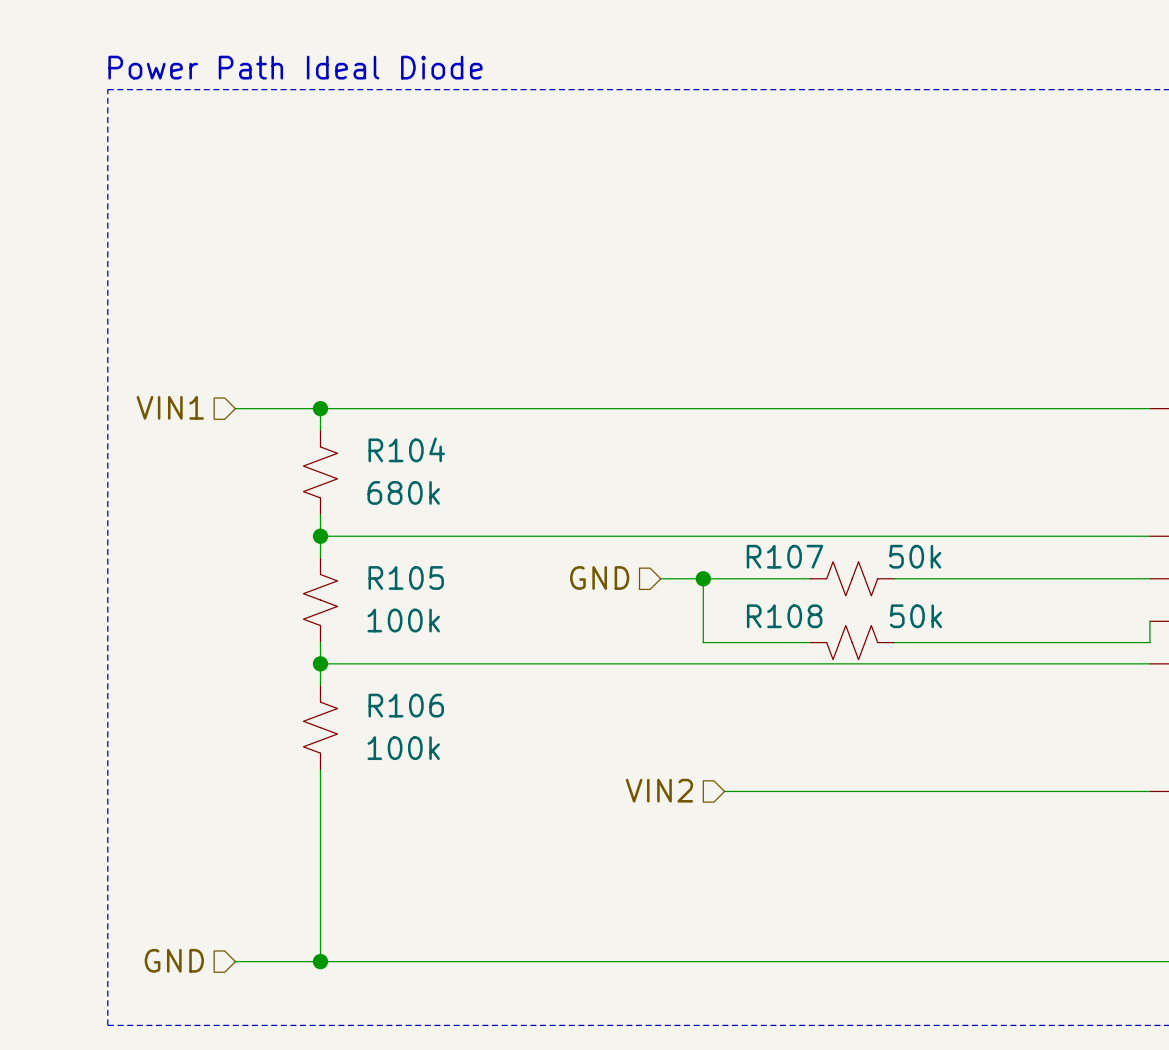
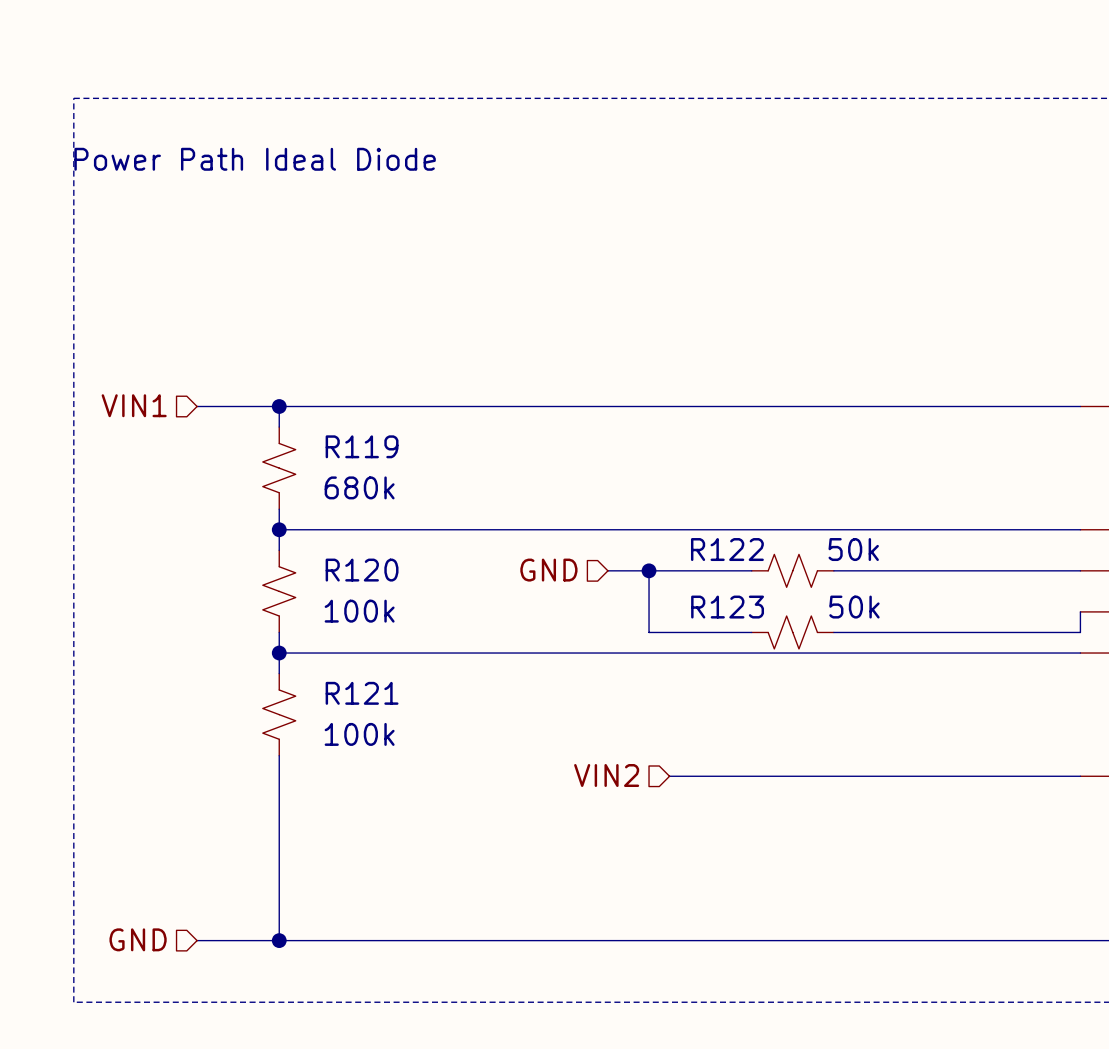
text position: Power Path Ideal Diode (295, 67) -> Power Path Ideal Diode (255, 159)
R104 name: R104 (406, 449) -> R119 (362, 446)
R107 name: R107 (784, 556) -> R122 (727, 549)
R105 name: R105 (406, 577) -> R120 (362, 570)
R108 name: R108 (784, 616) -> R123 (727, 607)
R106 name: R106 (406, 705) -> R121 (362, 693)

